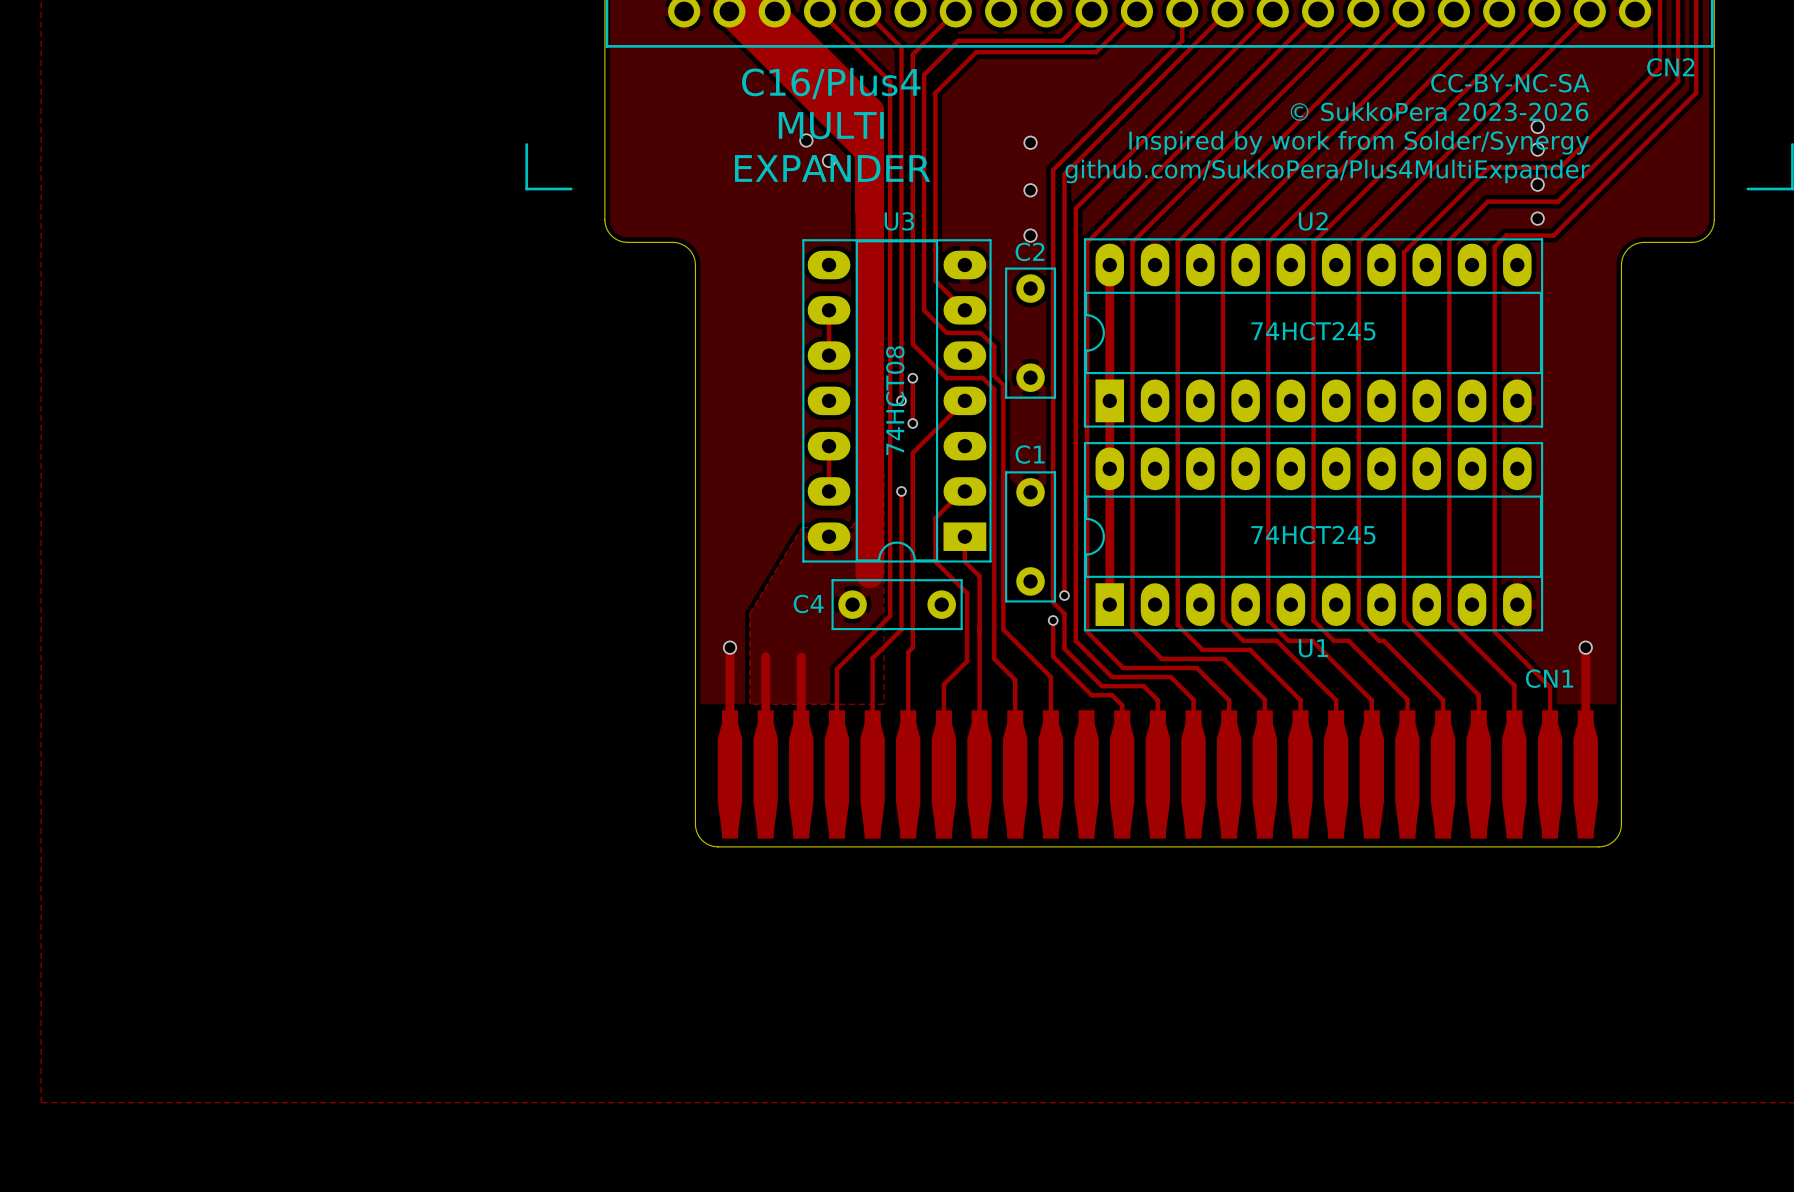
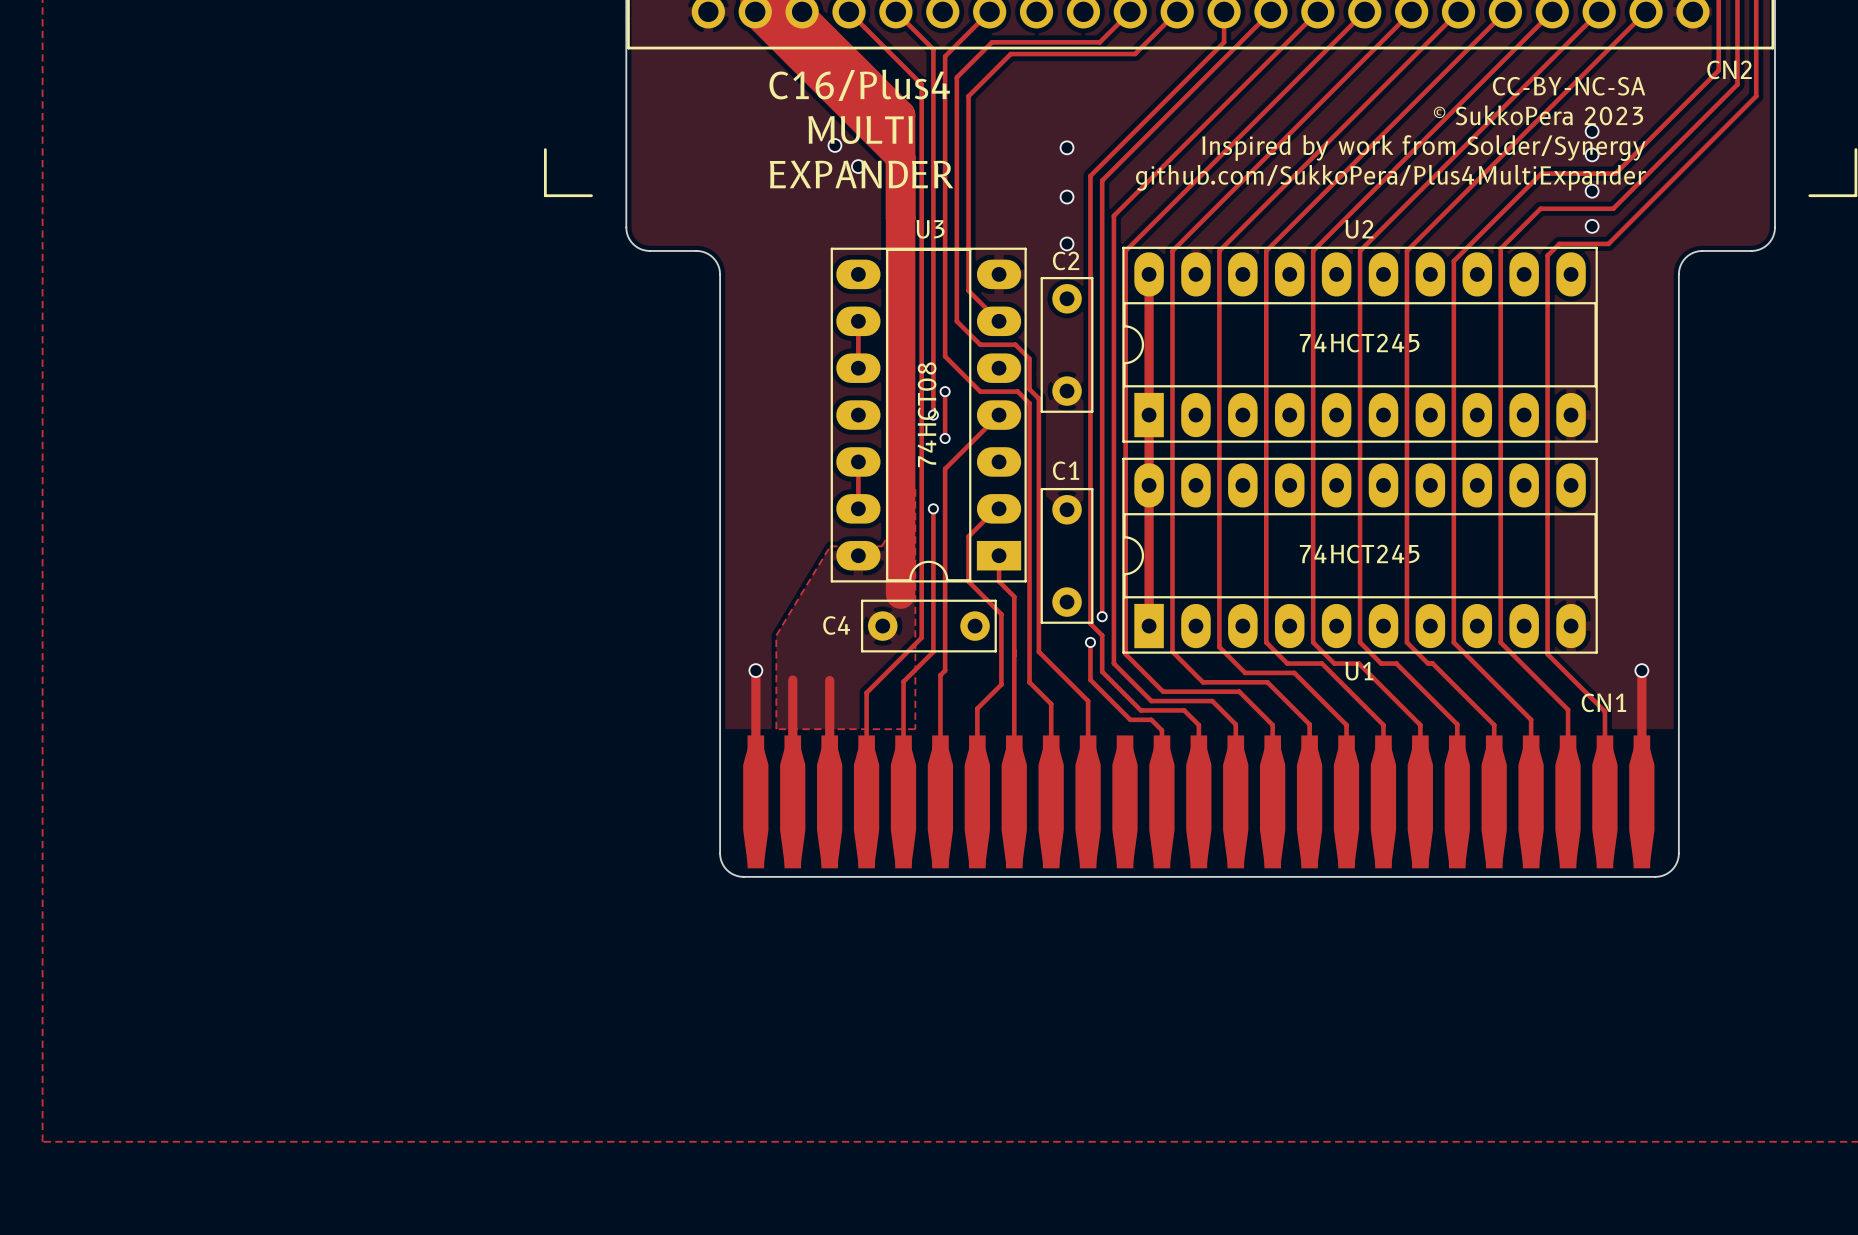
text: © SukkoPera 2023-2026 (1439, 111) -> © SukkoPera 2023 (1538, 115)

